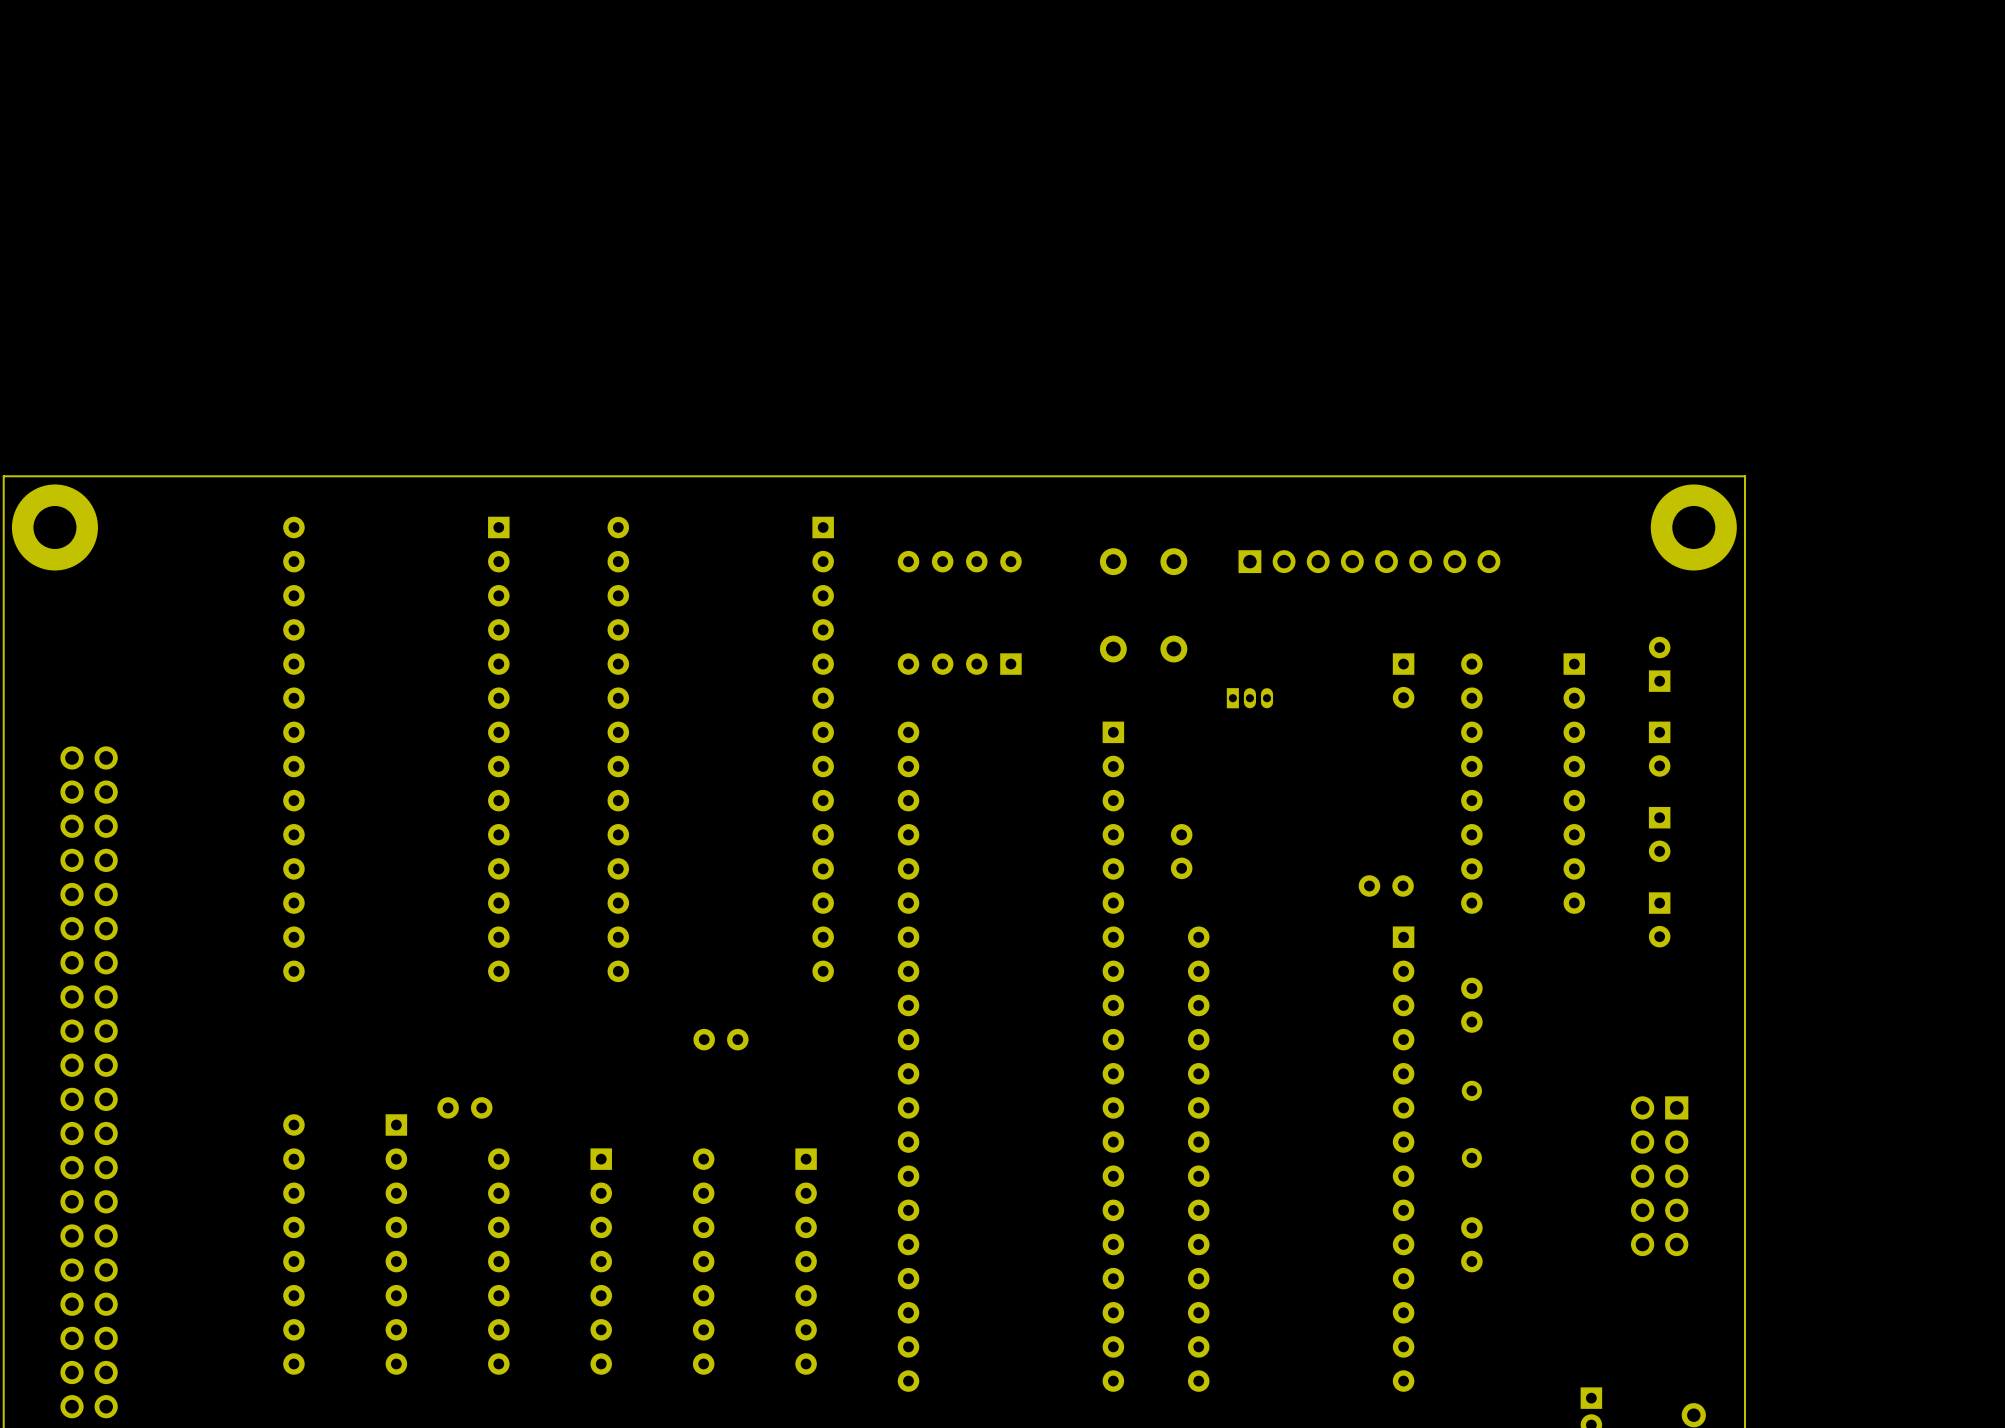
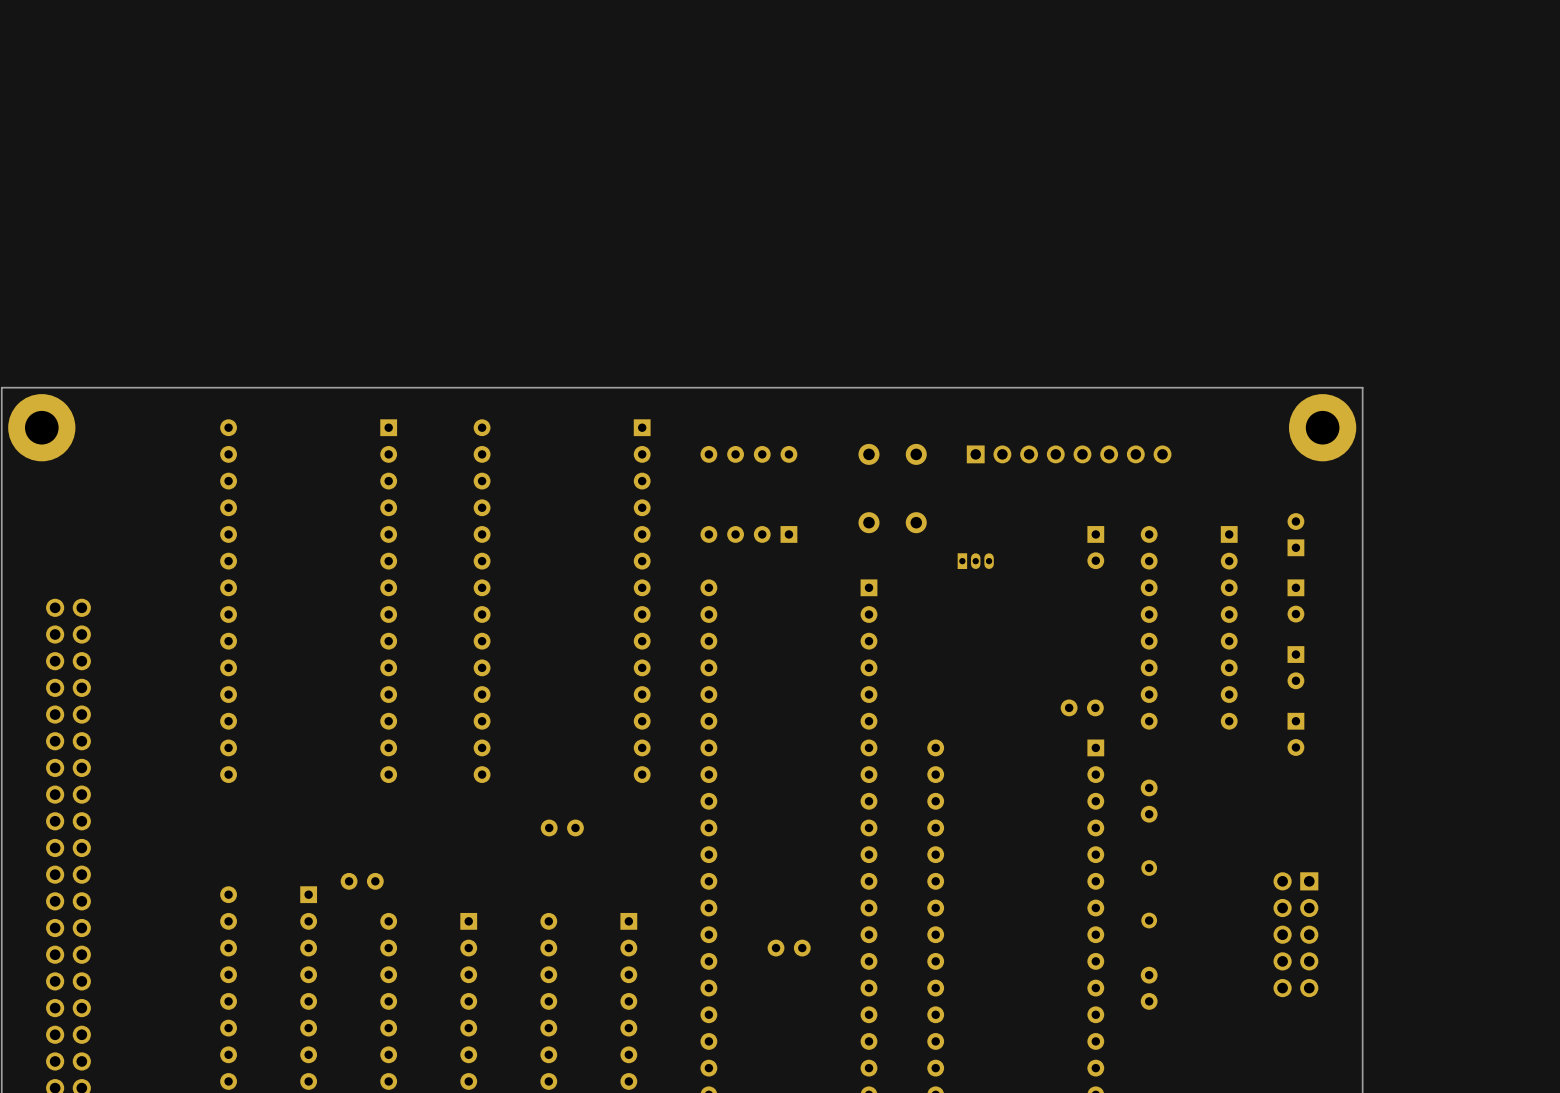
part: (1181, 851) -> none
part: none -> (789, 948)

